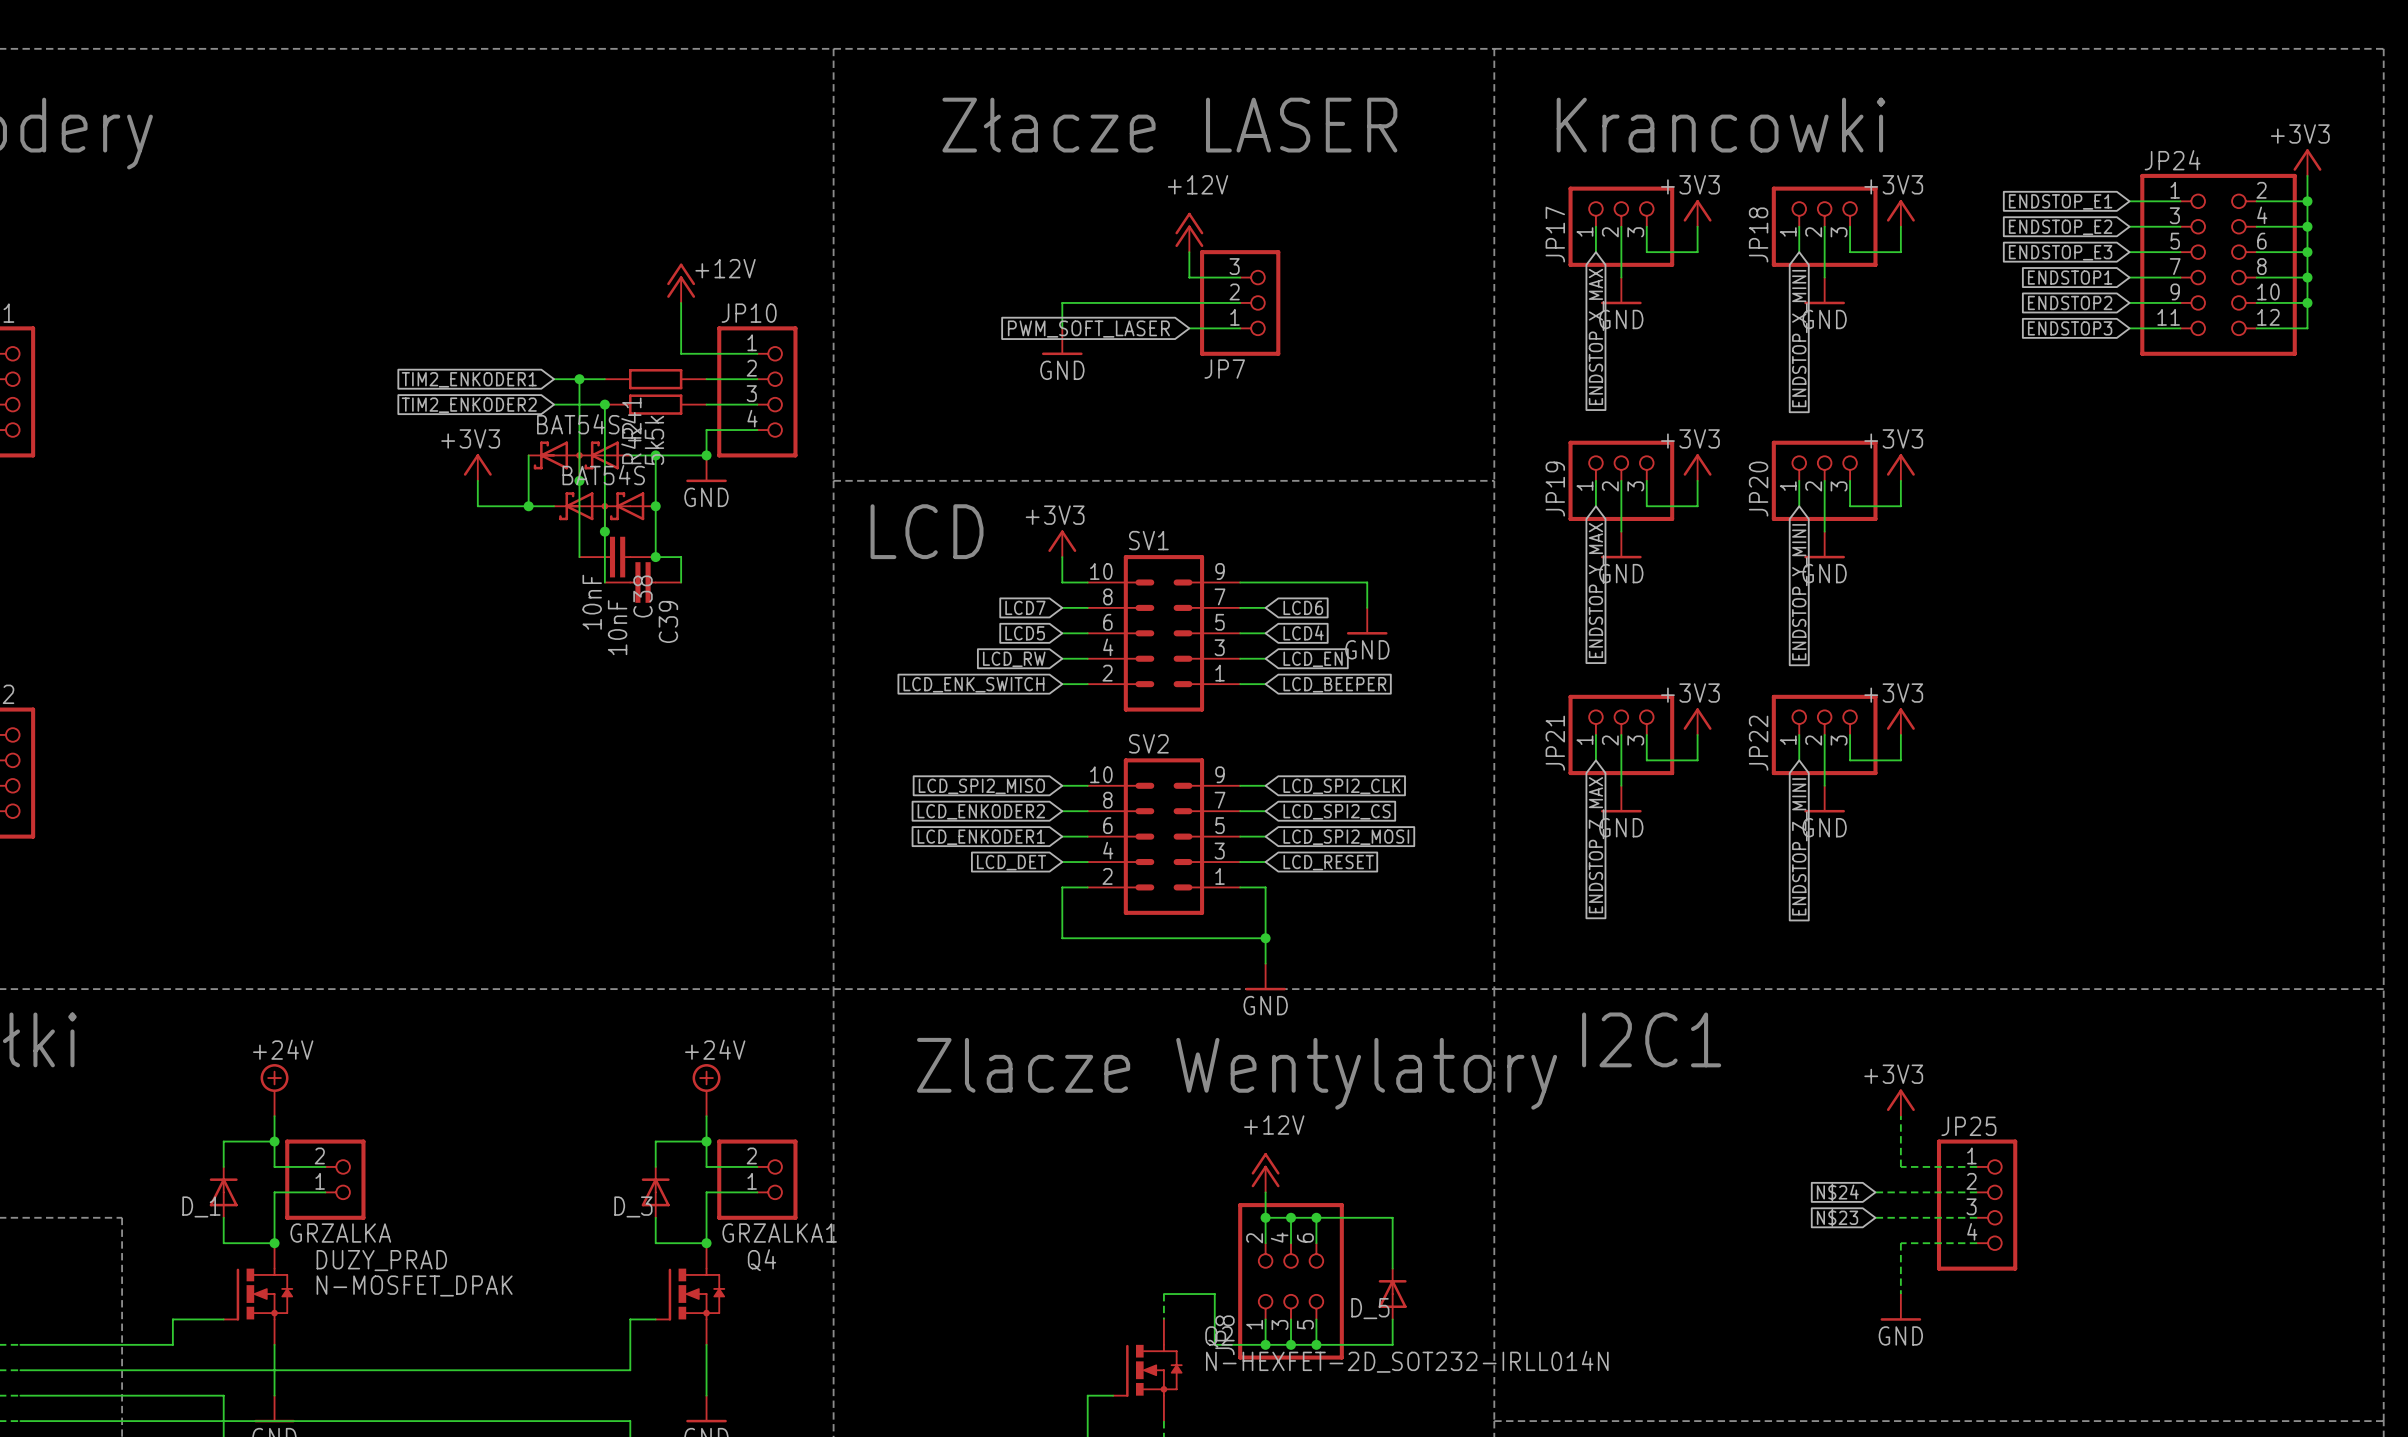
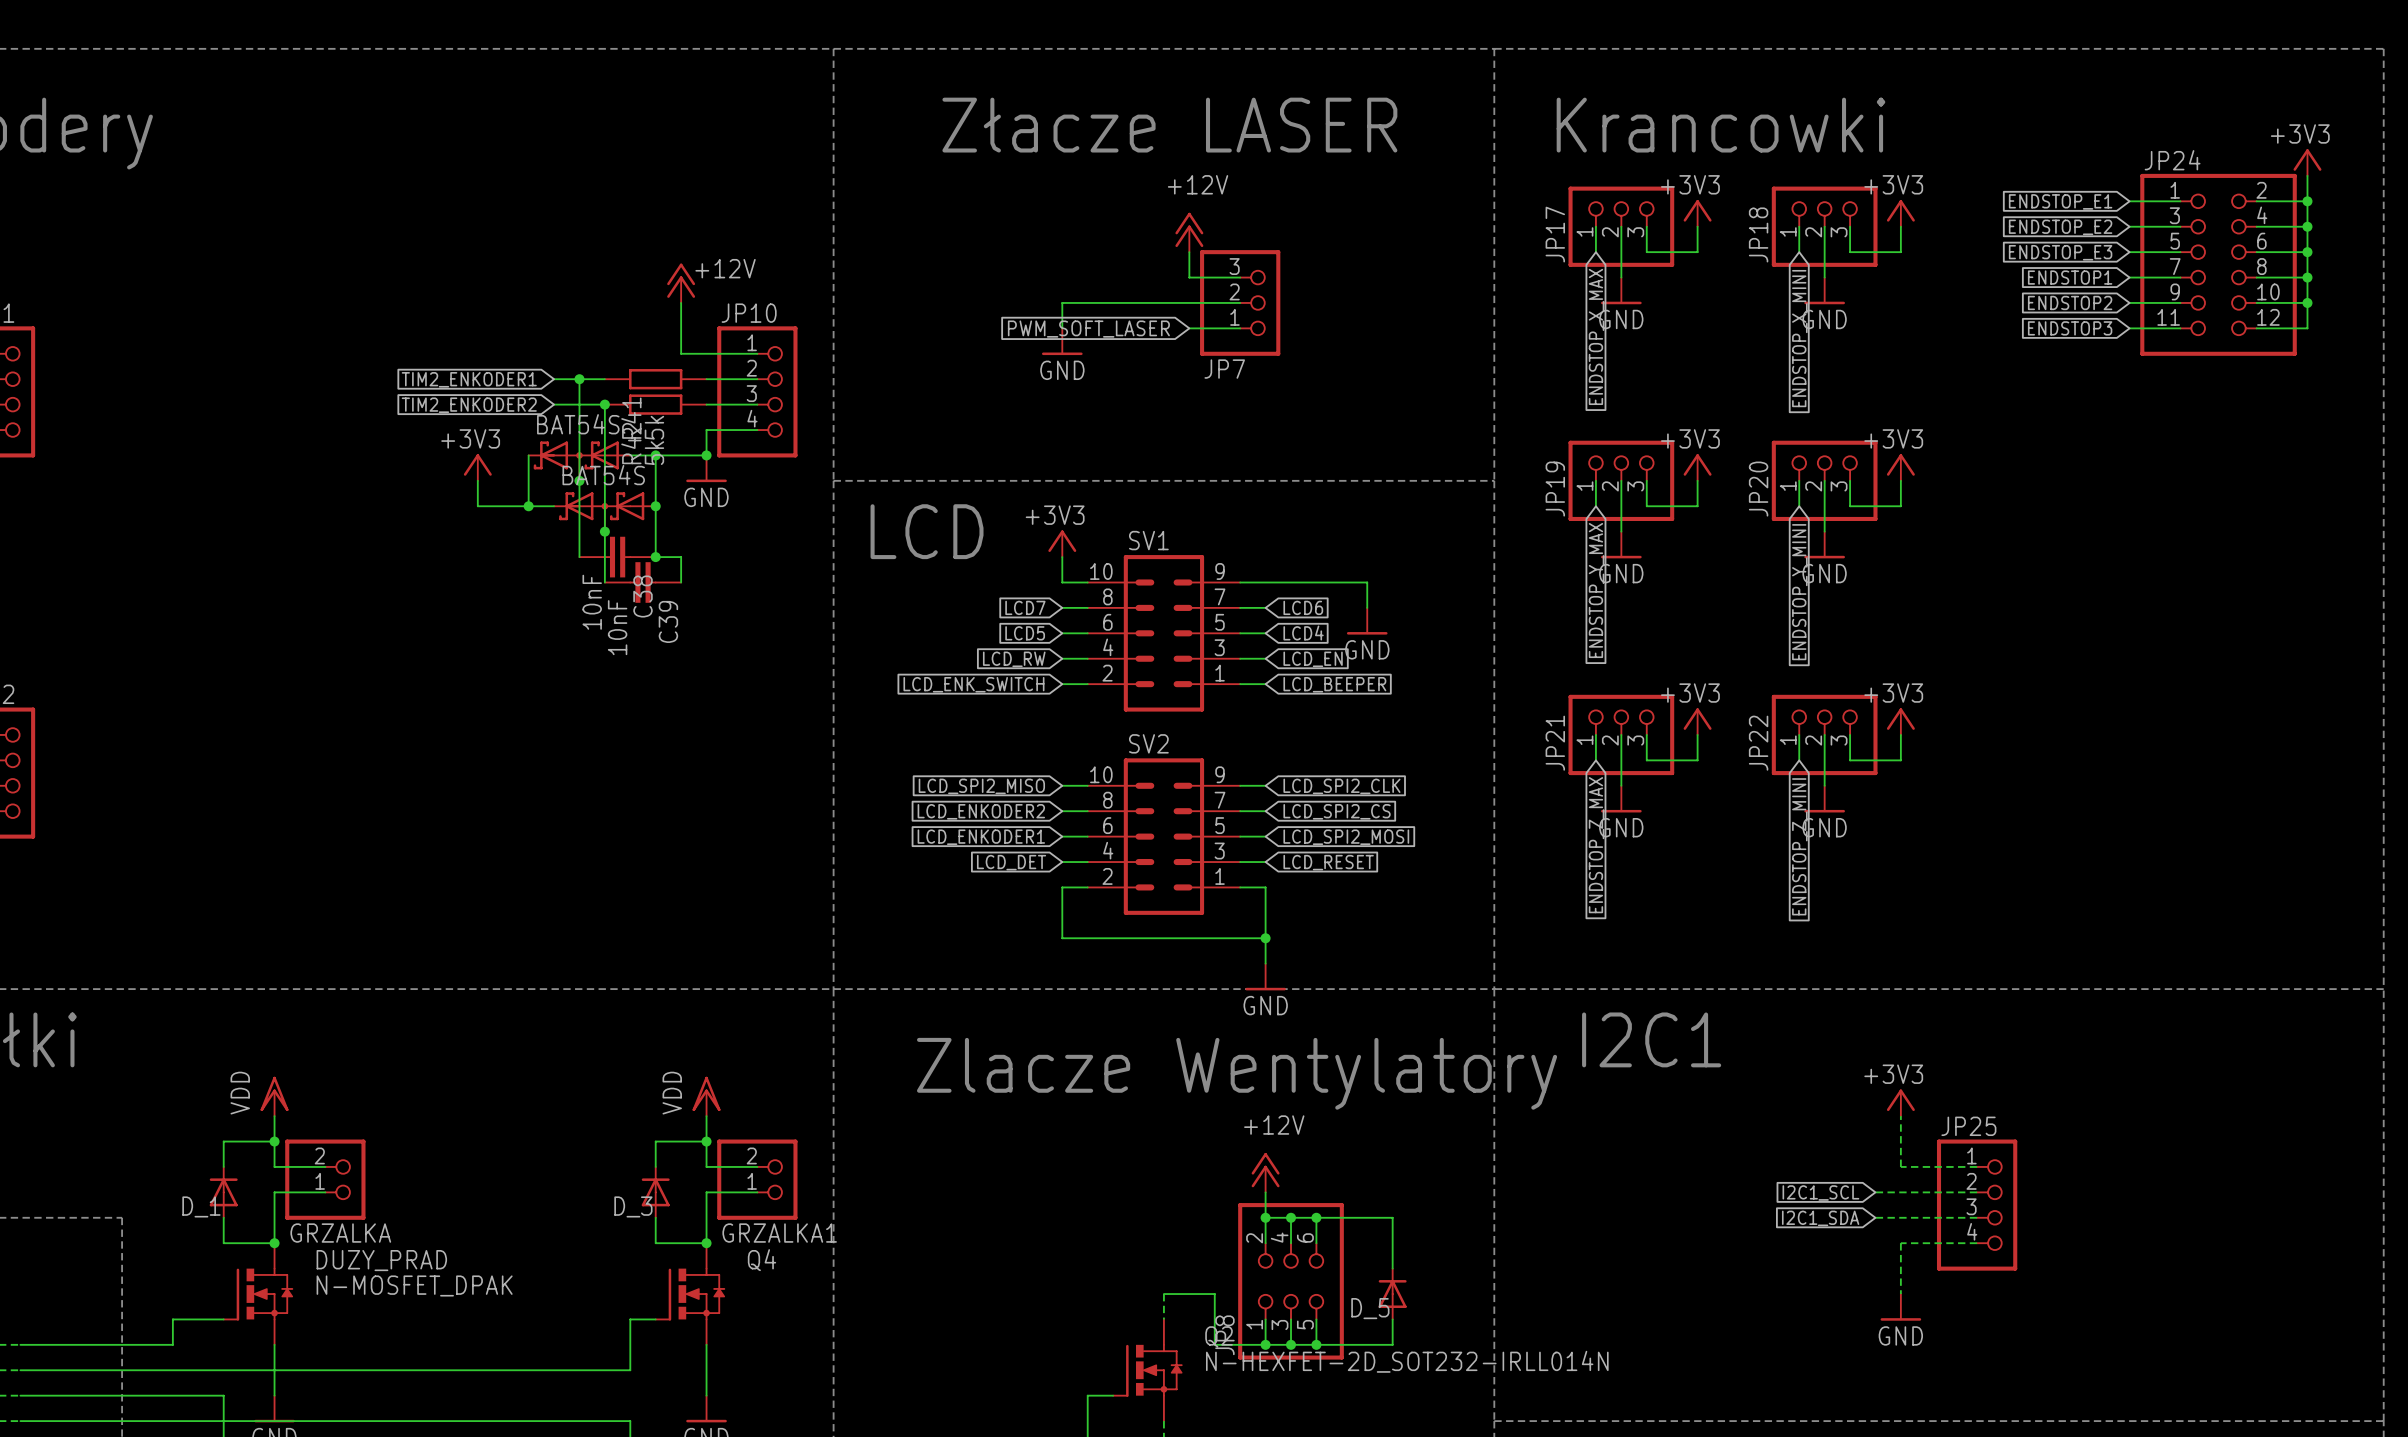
power symbol: +24V (274, 1090) -> VDD (274, 1096)
power symbol: +24V (706, 1090) -> VDD (706, 1096)
global label: N$24 (1837, 1192) -> I2C1_SCL (1820, 1192)
global label: N$23 (1837, 1217) -> I2C1_SDA (1820, 1218)

